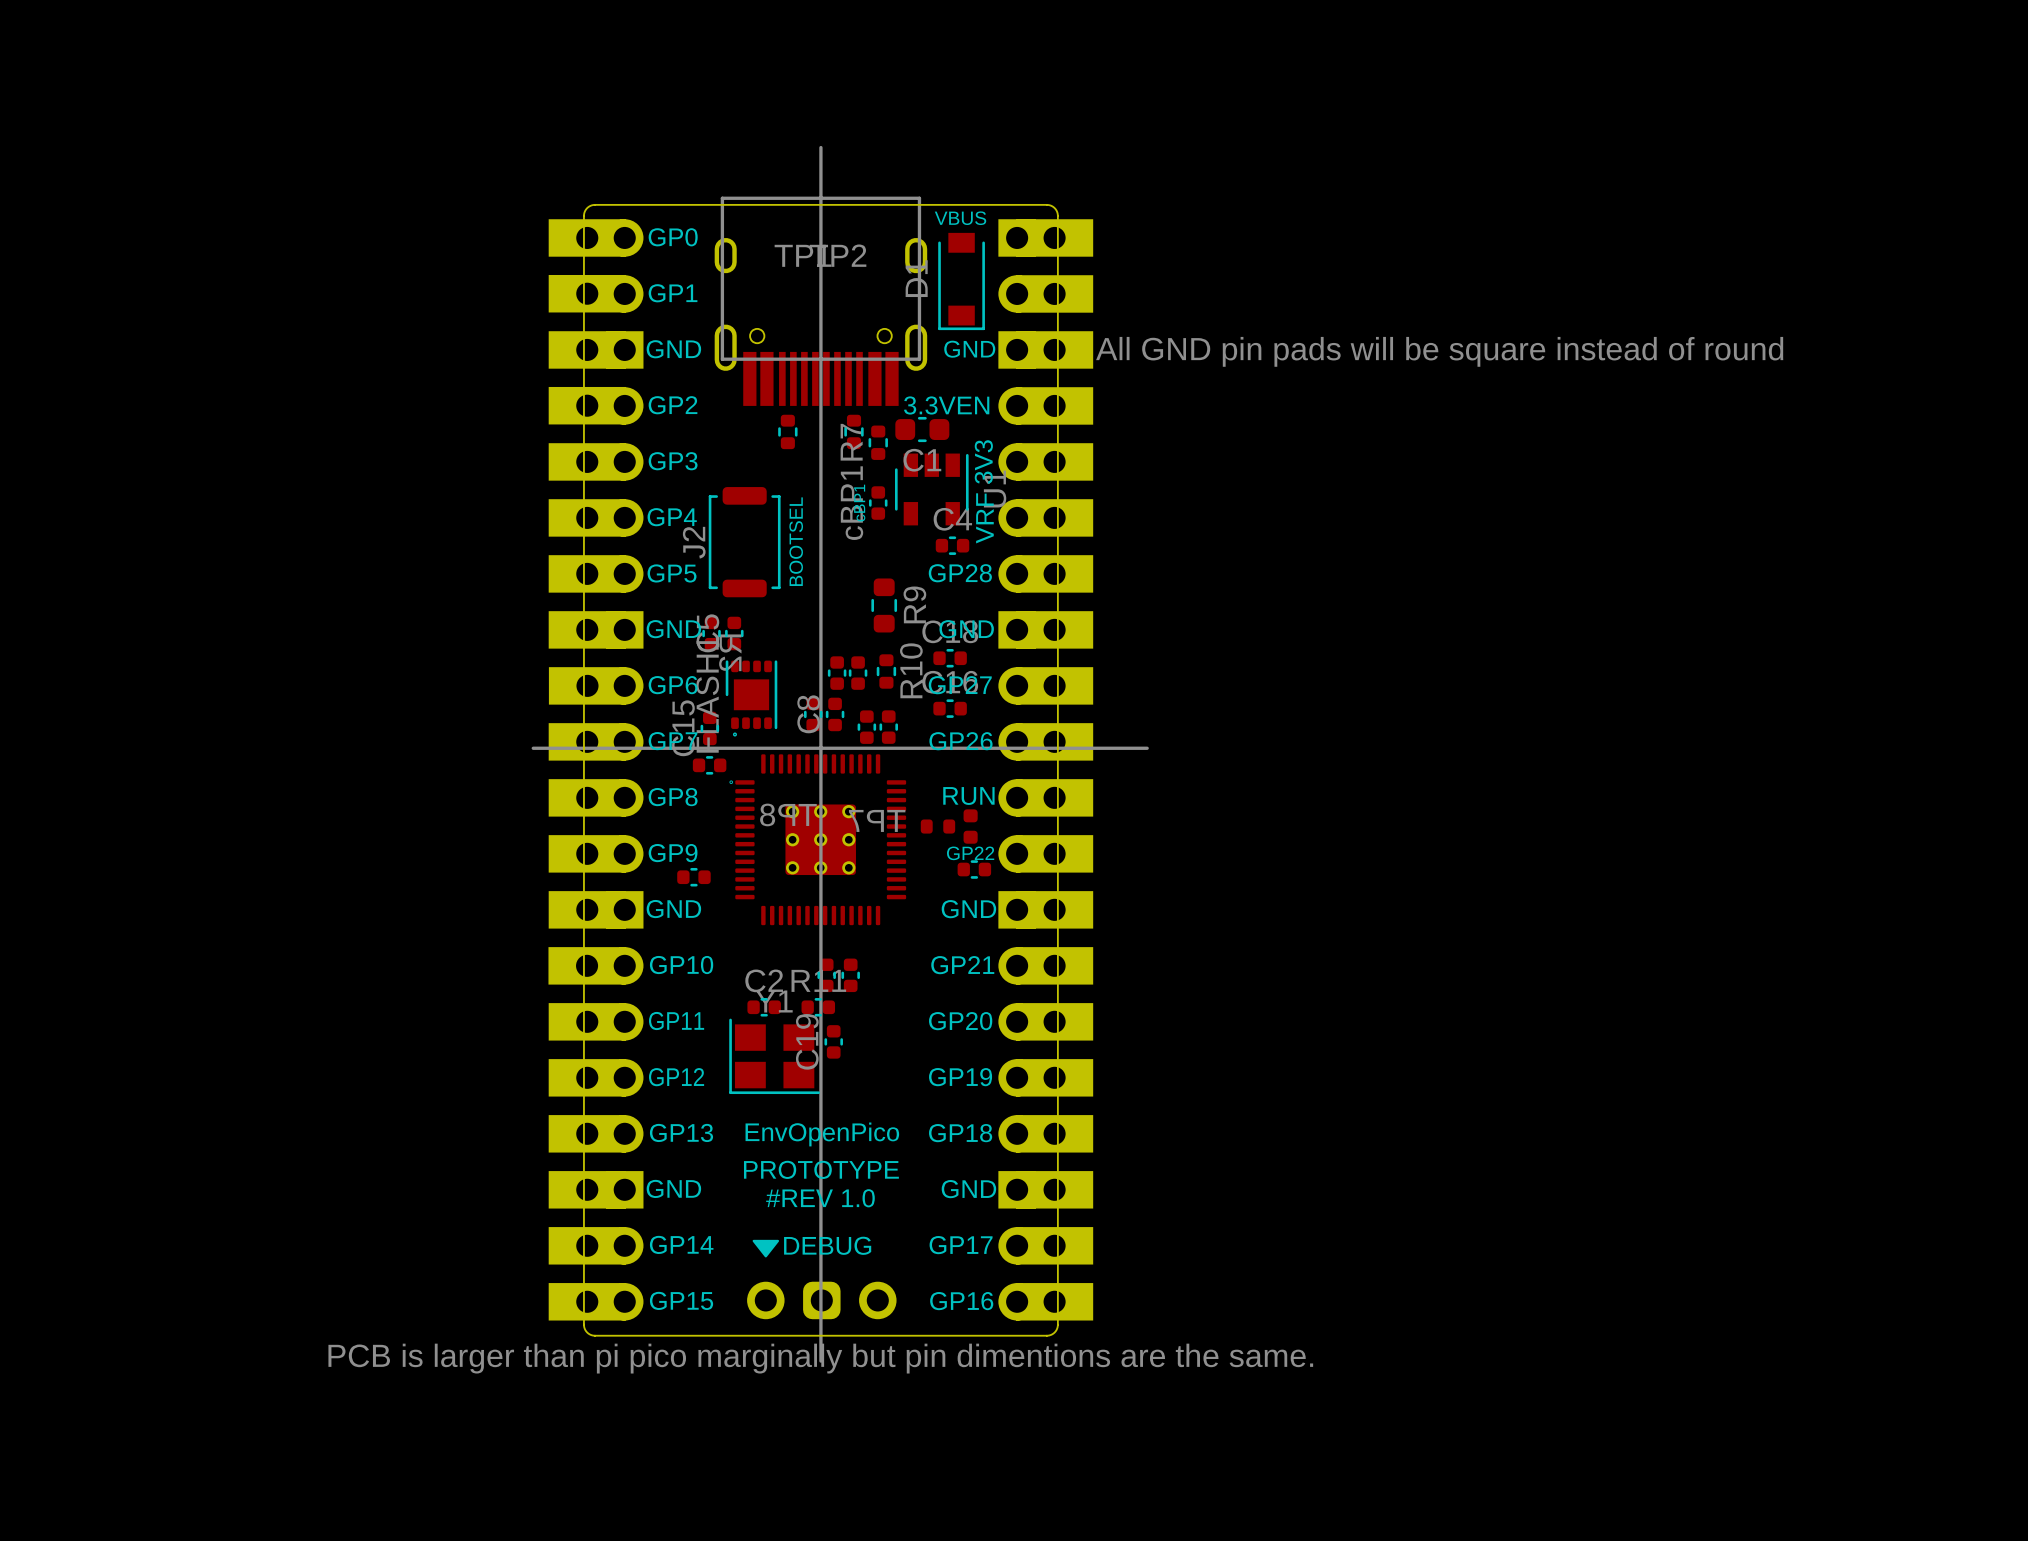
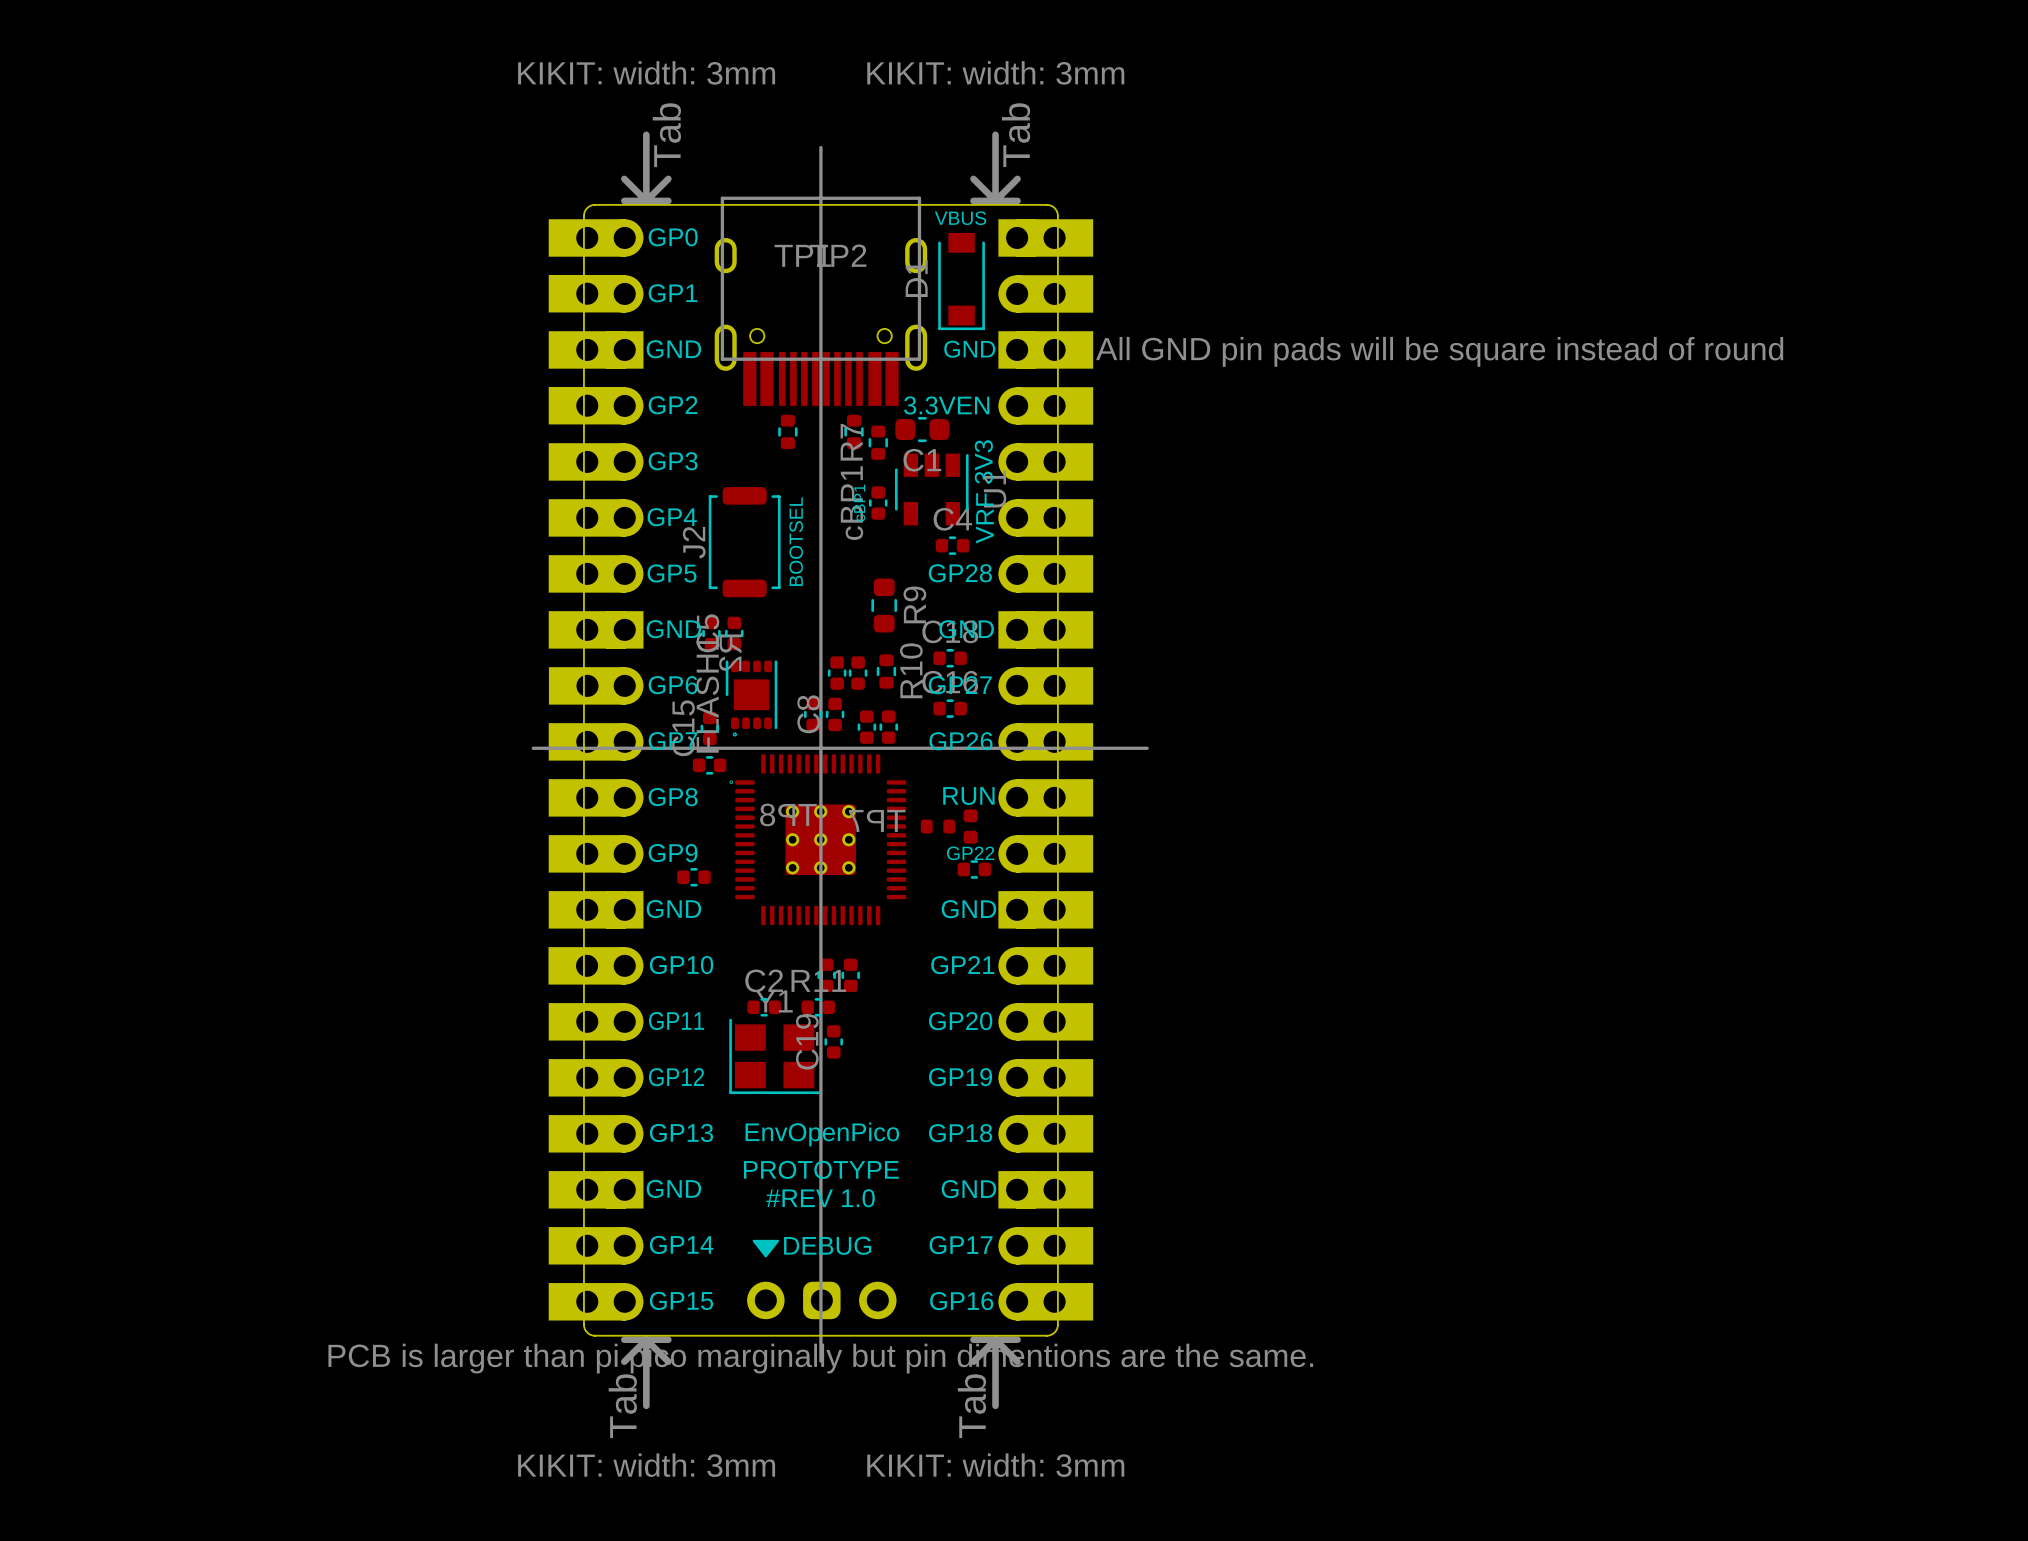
drawing: none -> [620, 131, 1021, 205]
drawing: none -> [620, 1336, 1021, 1410]

